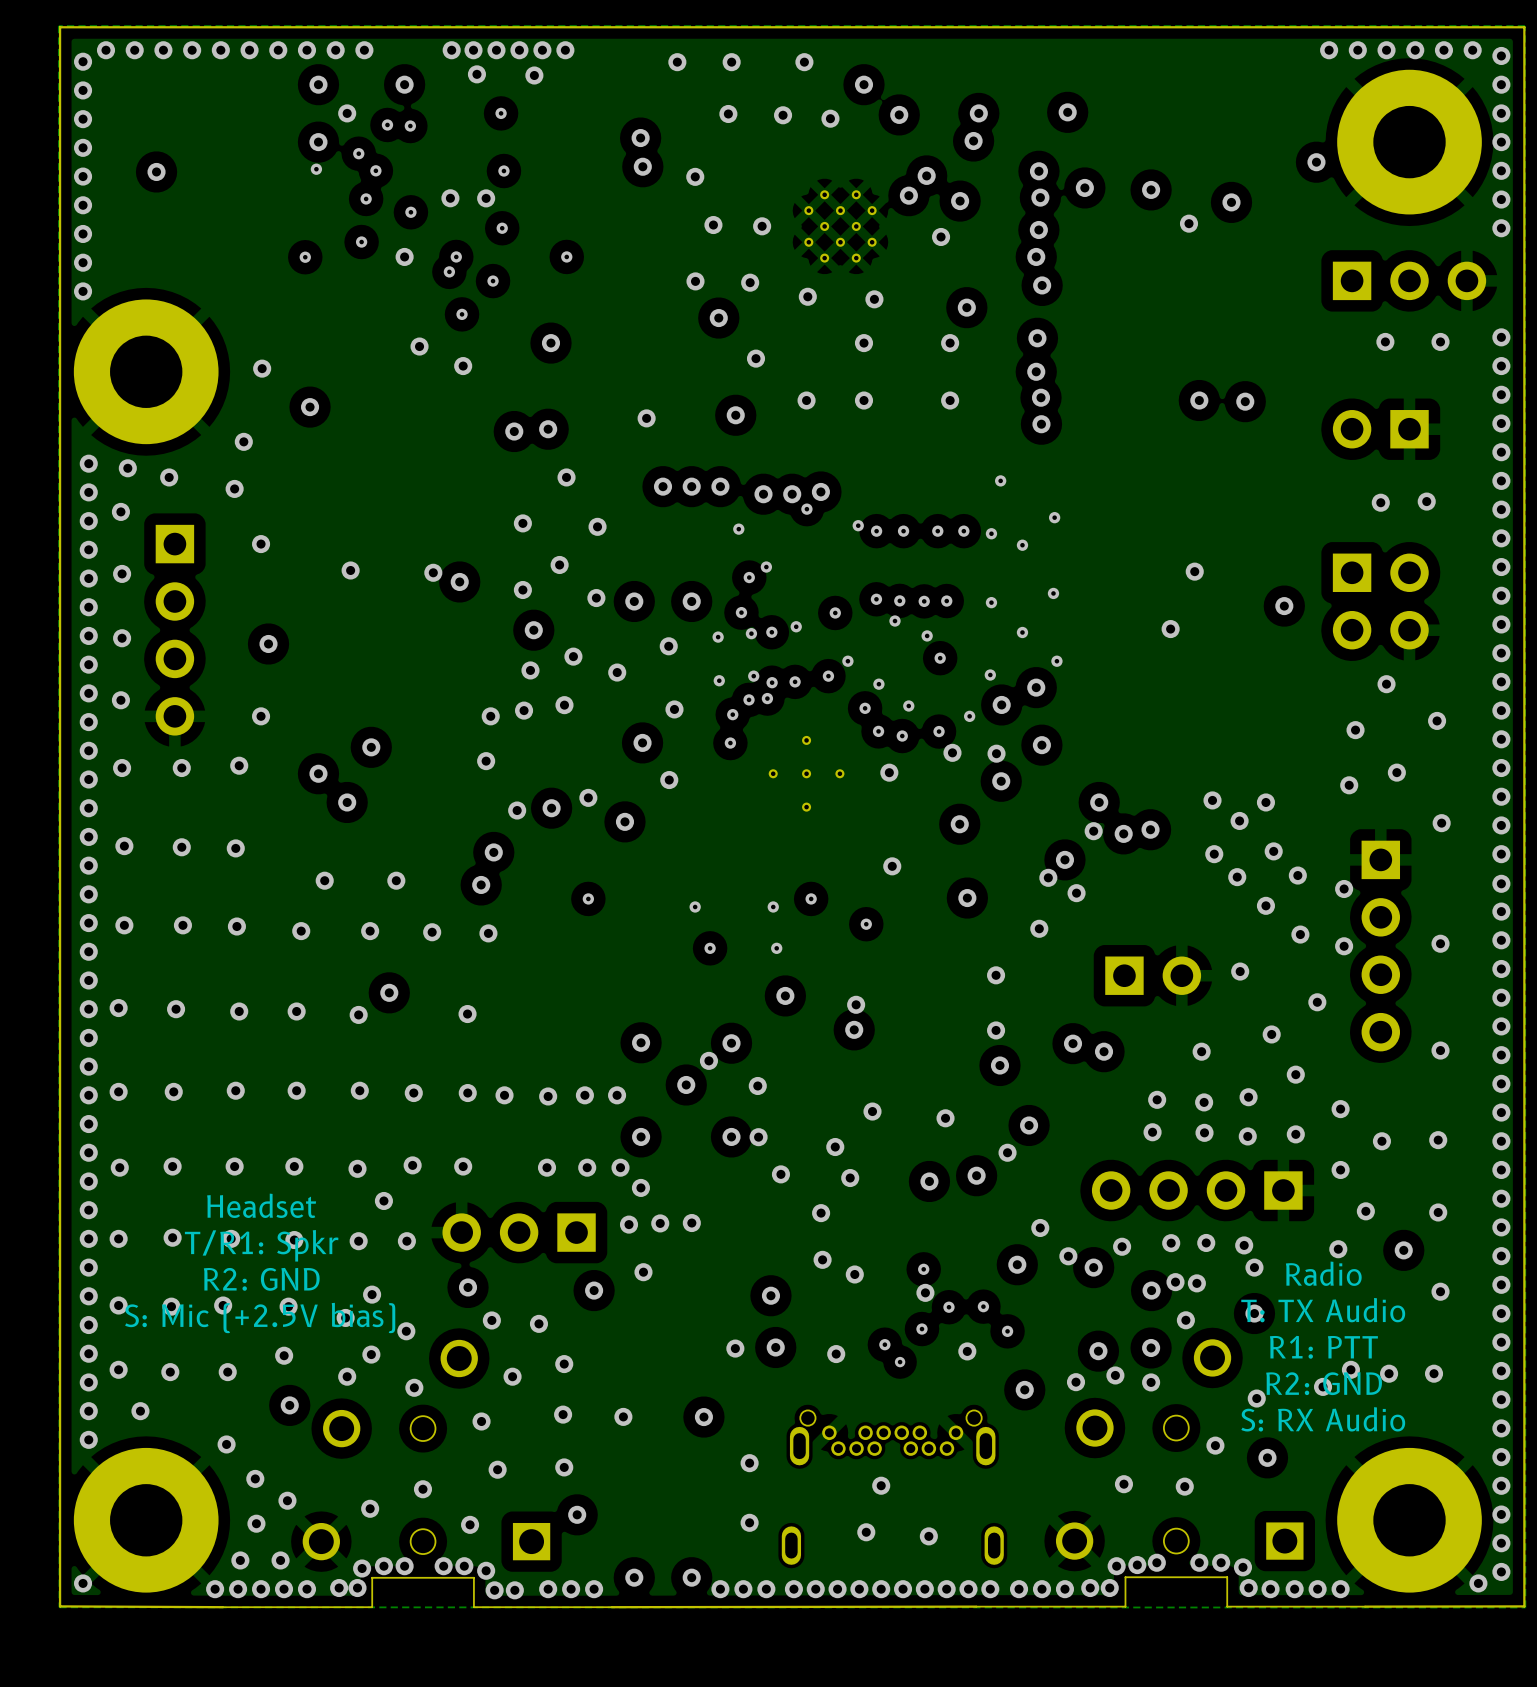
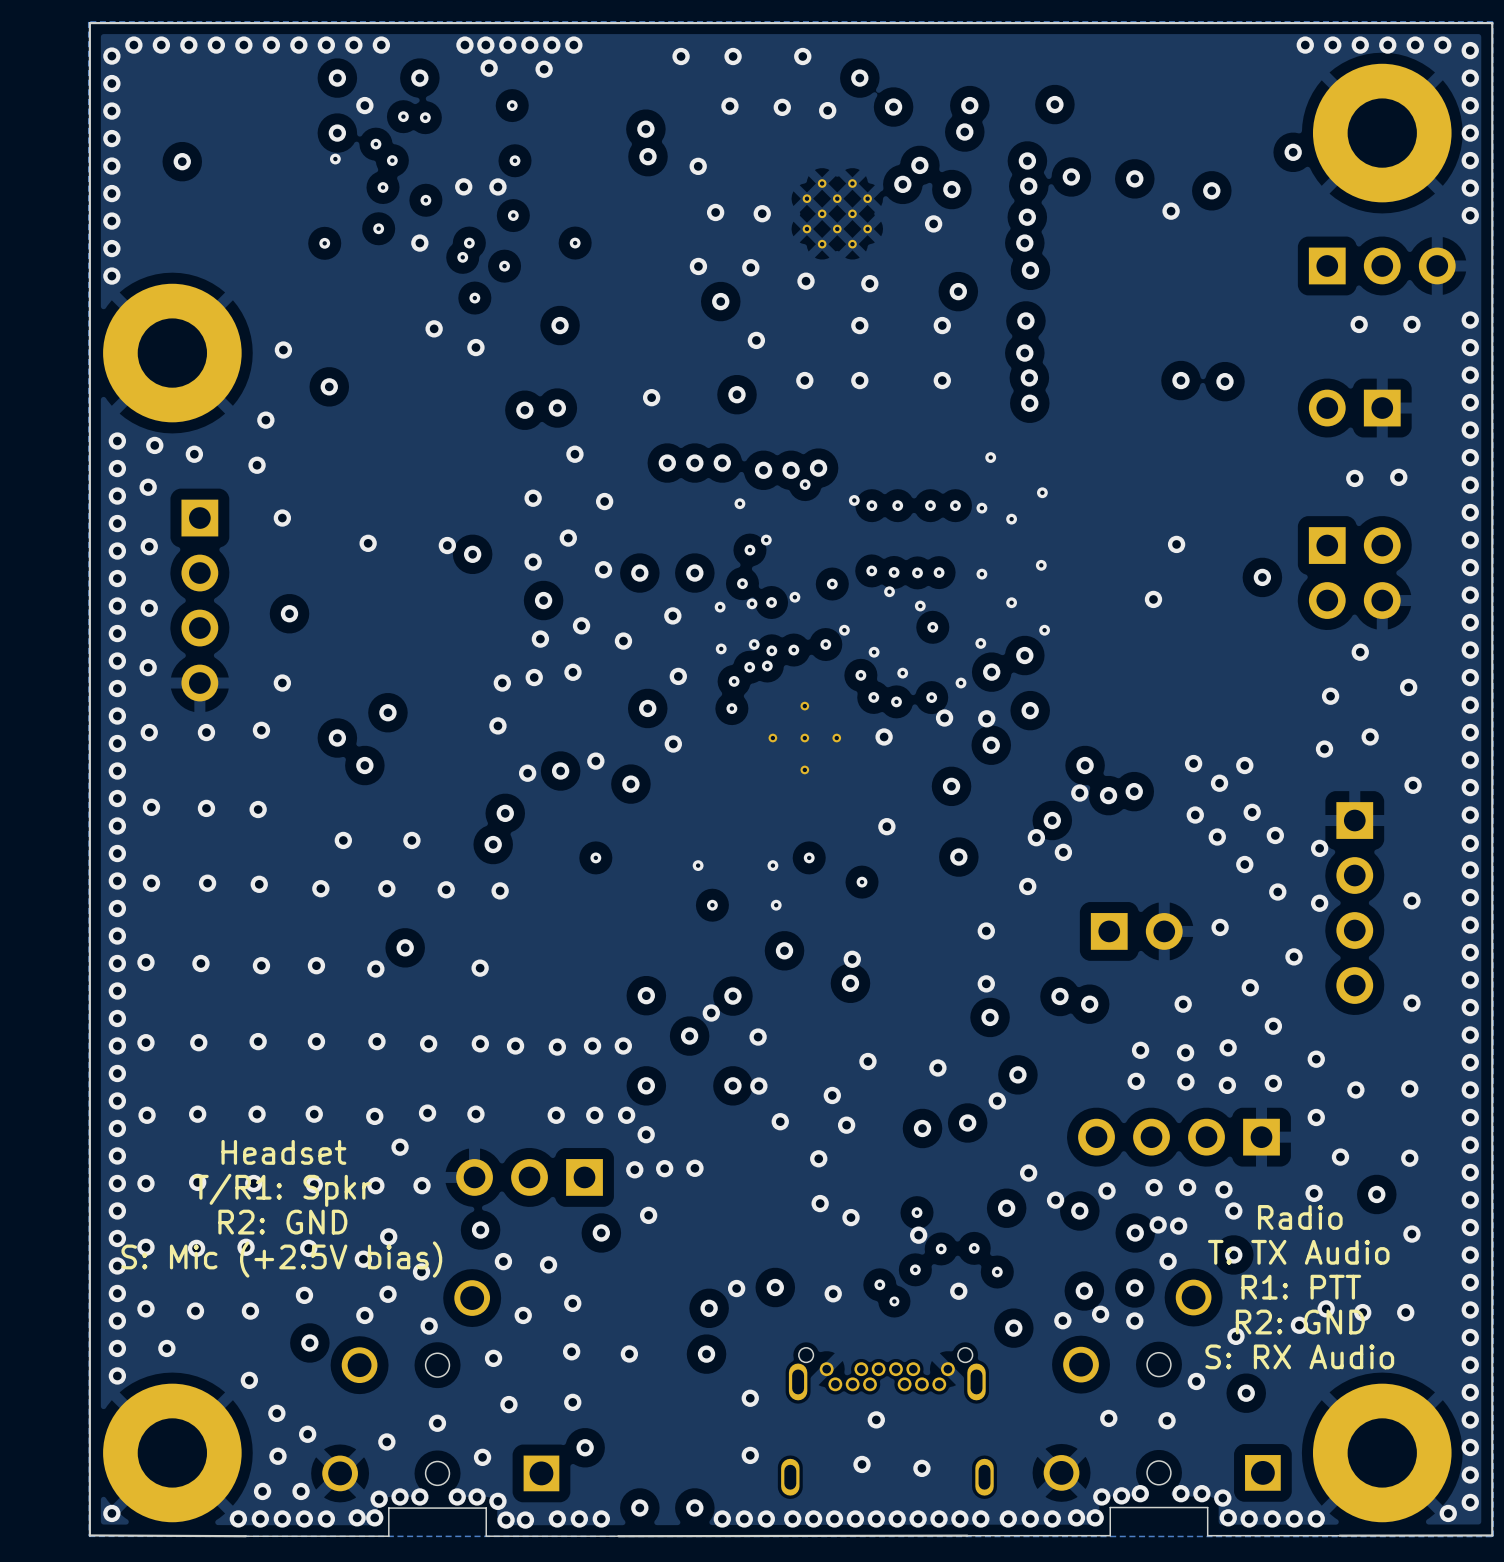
via position: (770, 1295) -> (709, 1308)

